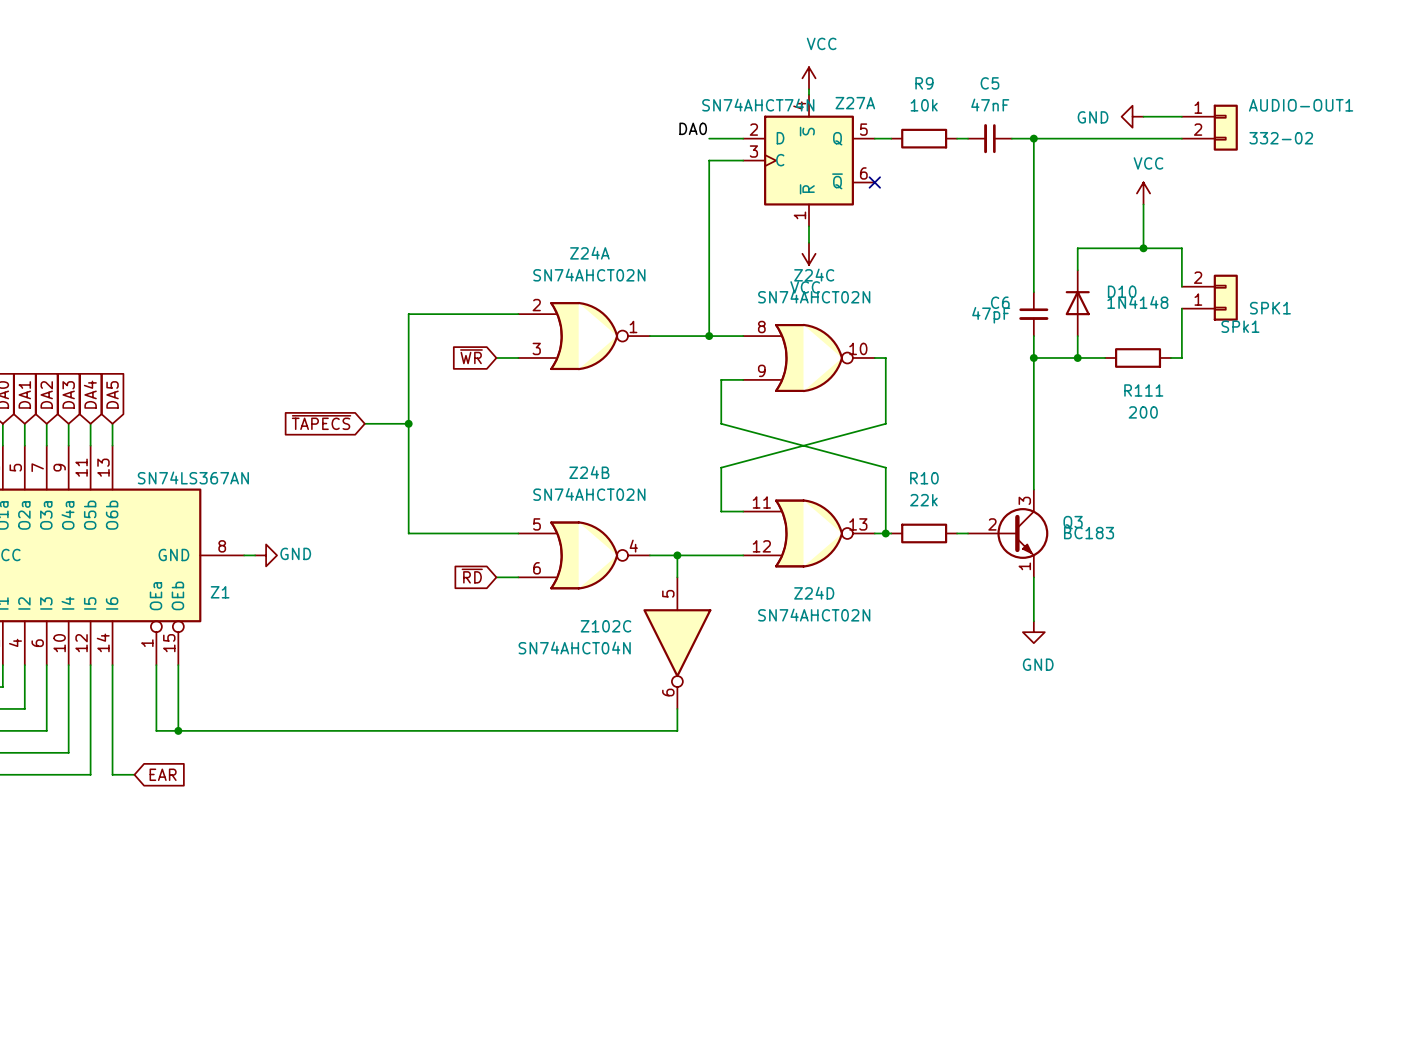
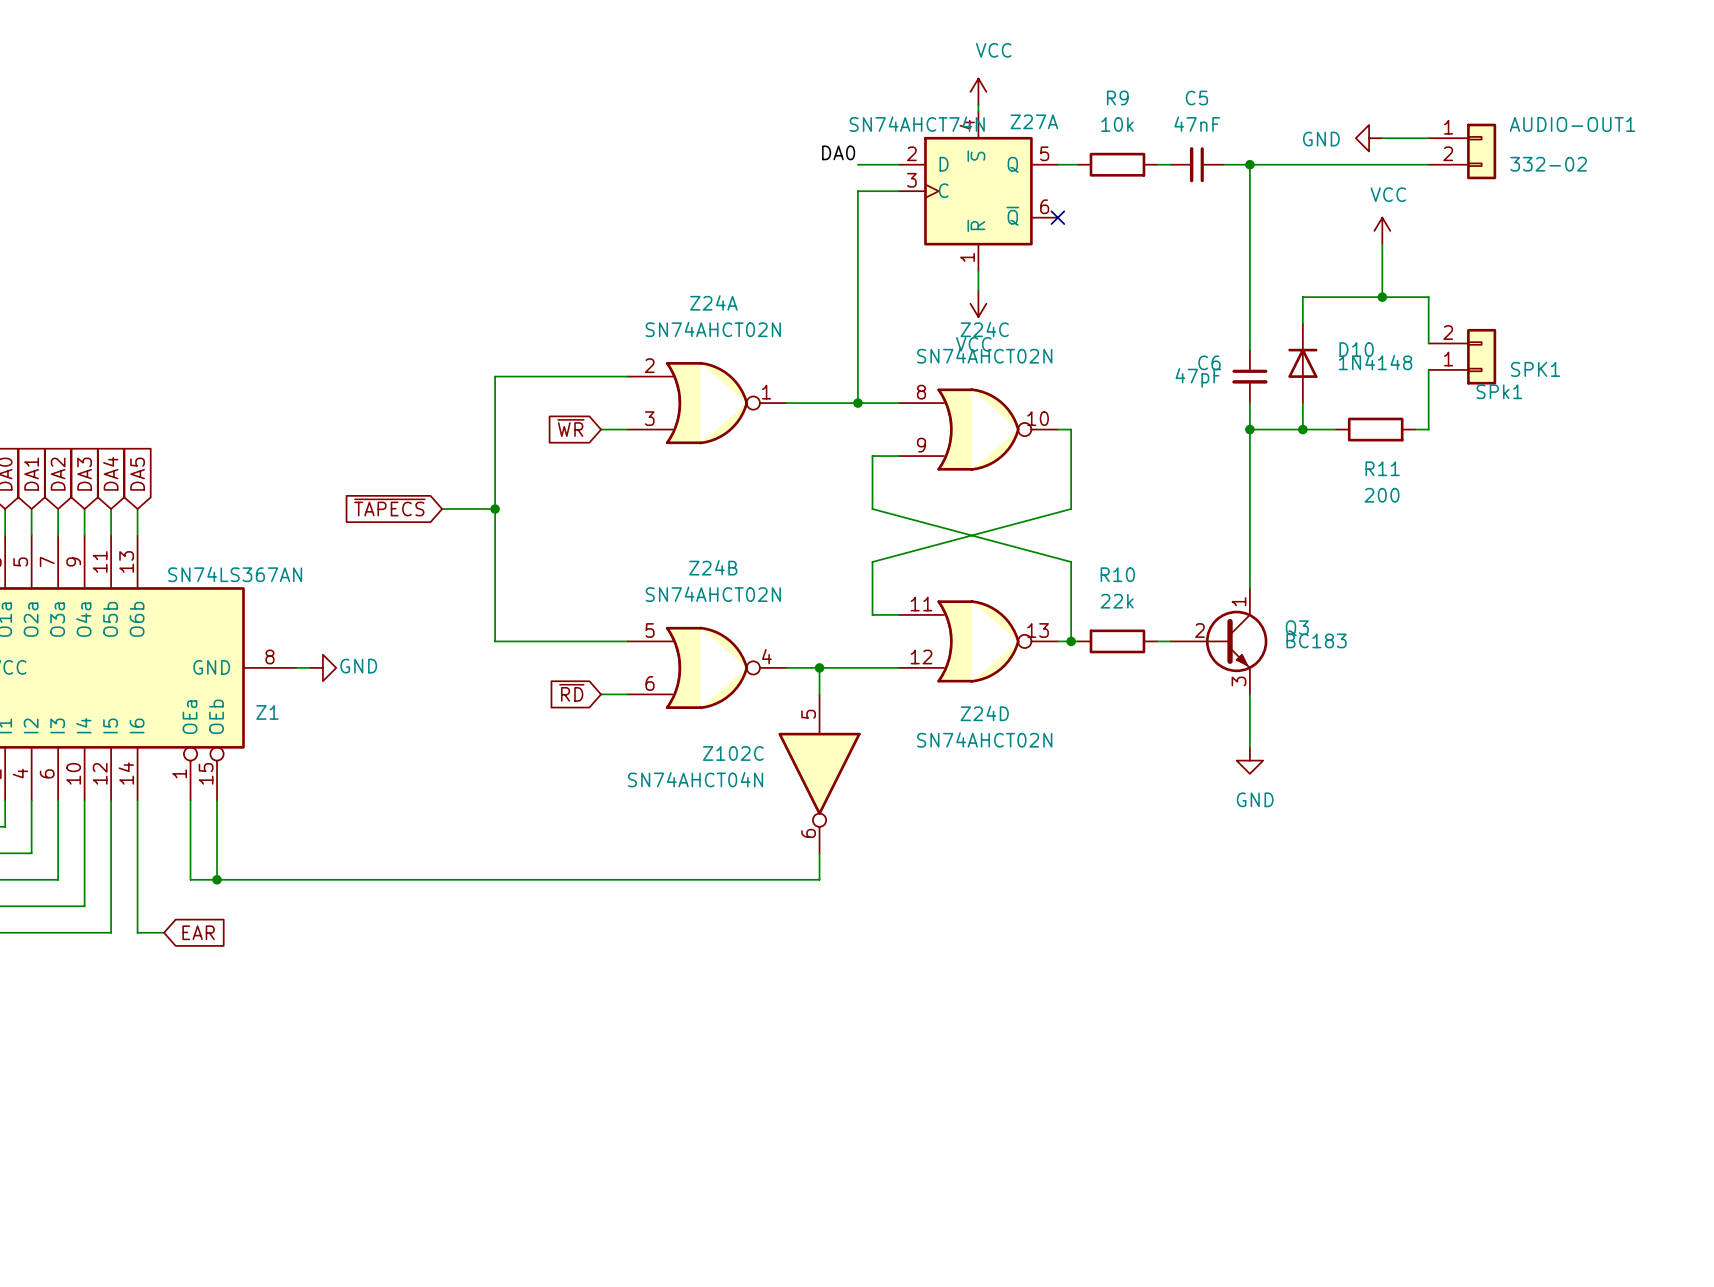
R111 name: R111 (1143, 390) -> R11 (1382, 468)
Q3 pin number: 3 (1024, 500) -> 1 (1238, 601)
Q3 pin number: 1 (1024, 566) -> 3 (1238, 681)

